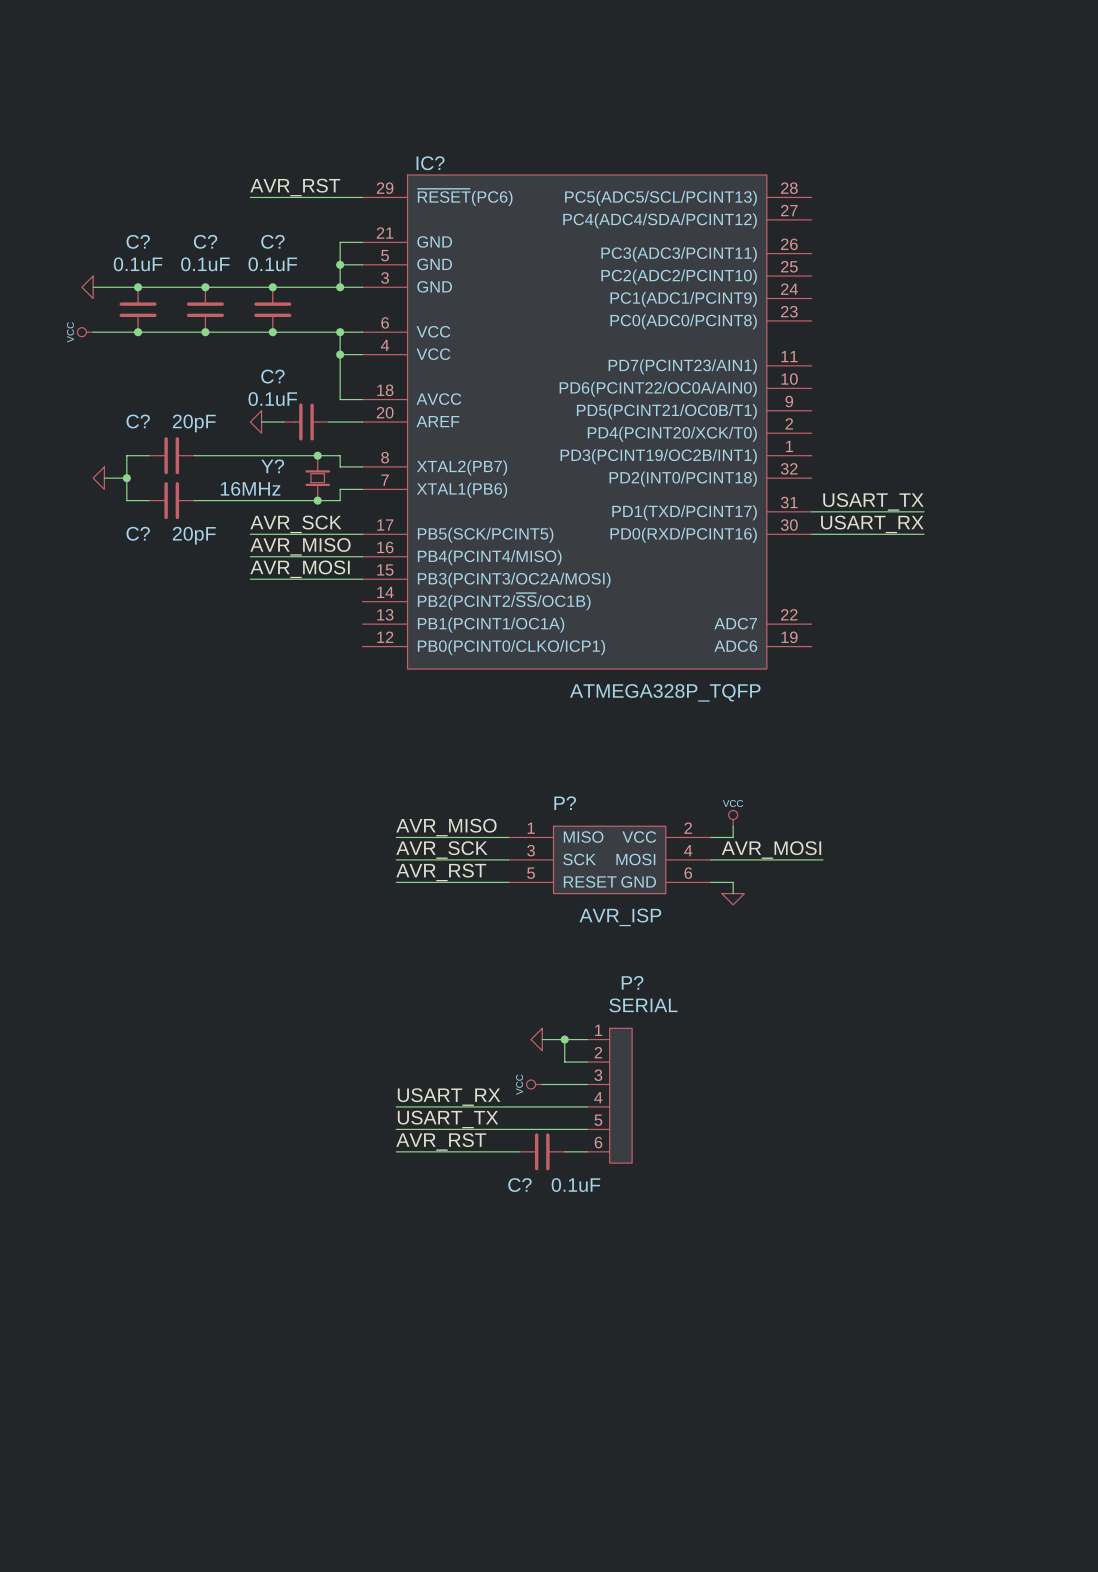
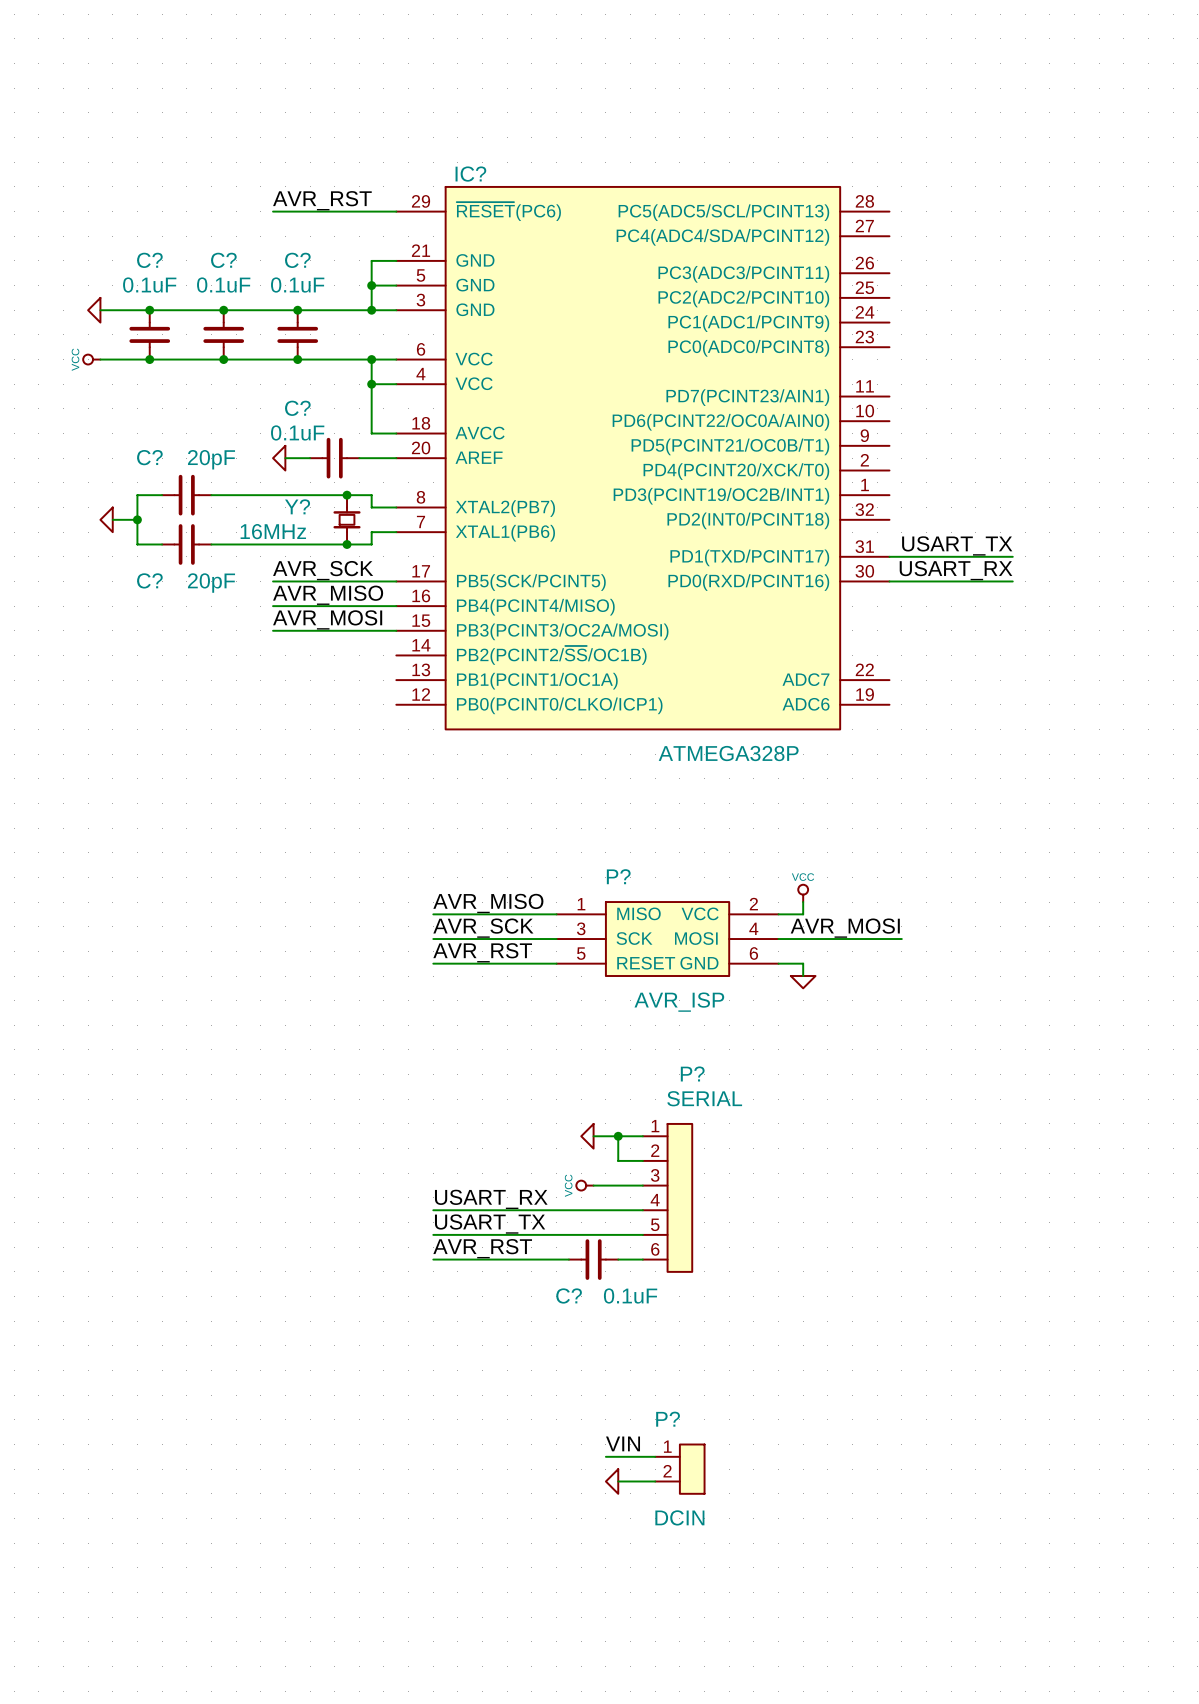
IC? value: ATMEGA328P_TQFP (665, 692) -> ATMEGA328P (728, 753)
label: none -> VIN (623, 1443)
wire: none -> (605, 1456) (655, 1456)
P?: none -> DCIN (679, 1469)
power symbol: none -> (612, 1481)
wire: none -> (618, 1481) (655, 1481)

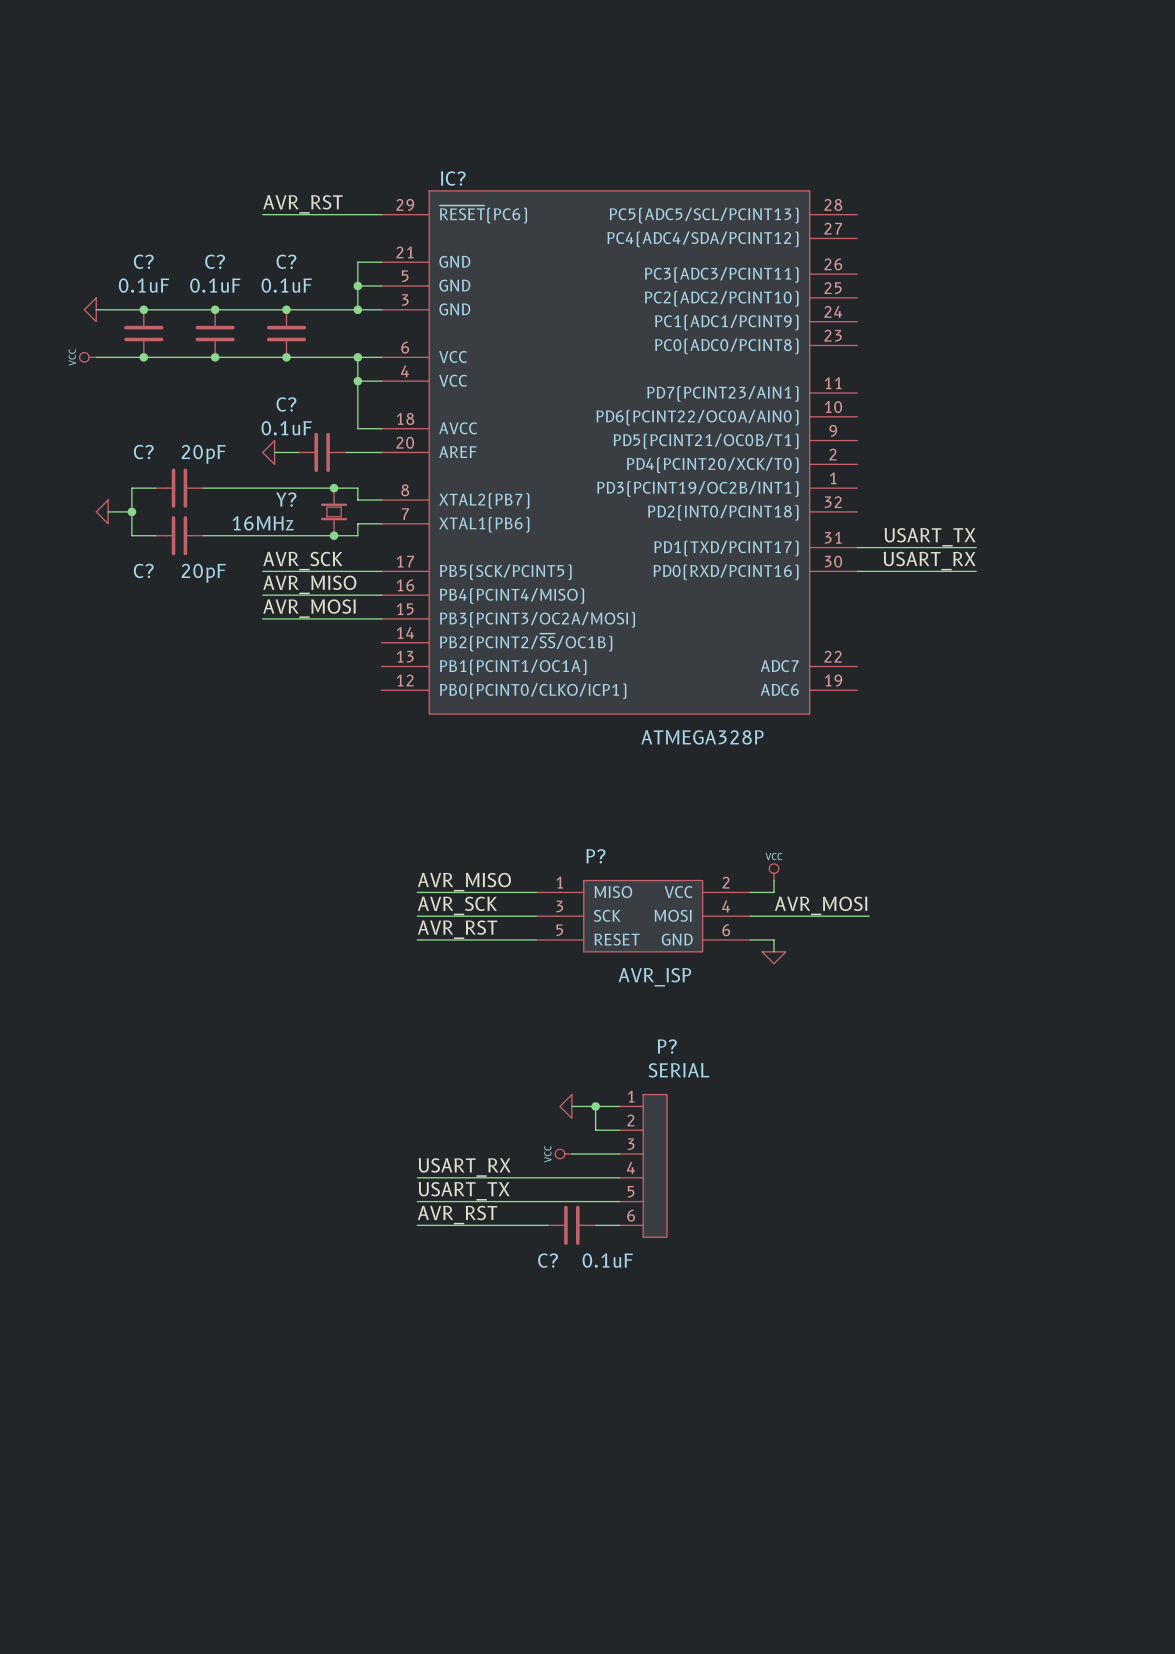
label: VIN (623, 1443) -> none
wire: (605, 1456) (655, 1456) -> none
P?: DCIN (679, 1469) -> none
power symbol: (612, 1481) -> none
wire: (618, 1481) (655, 1481) -> none

